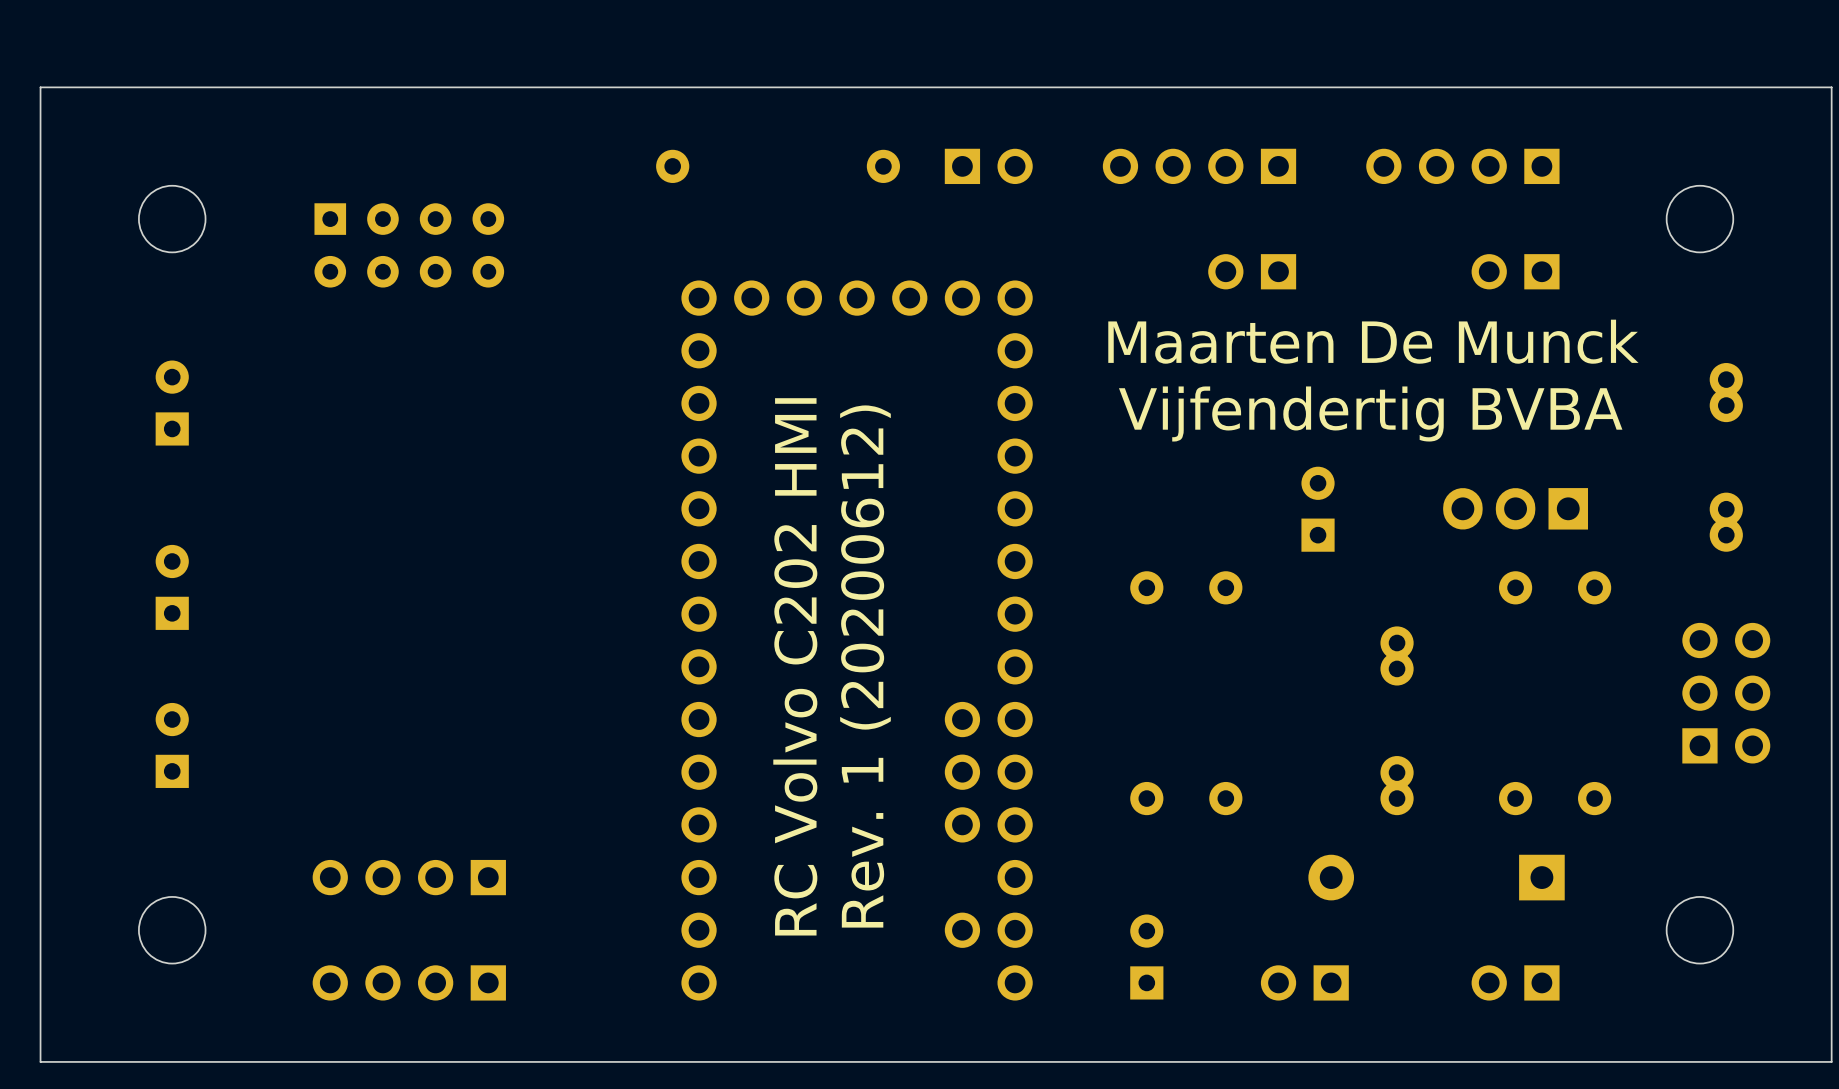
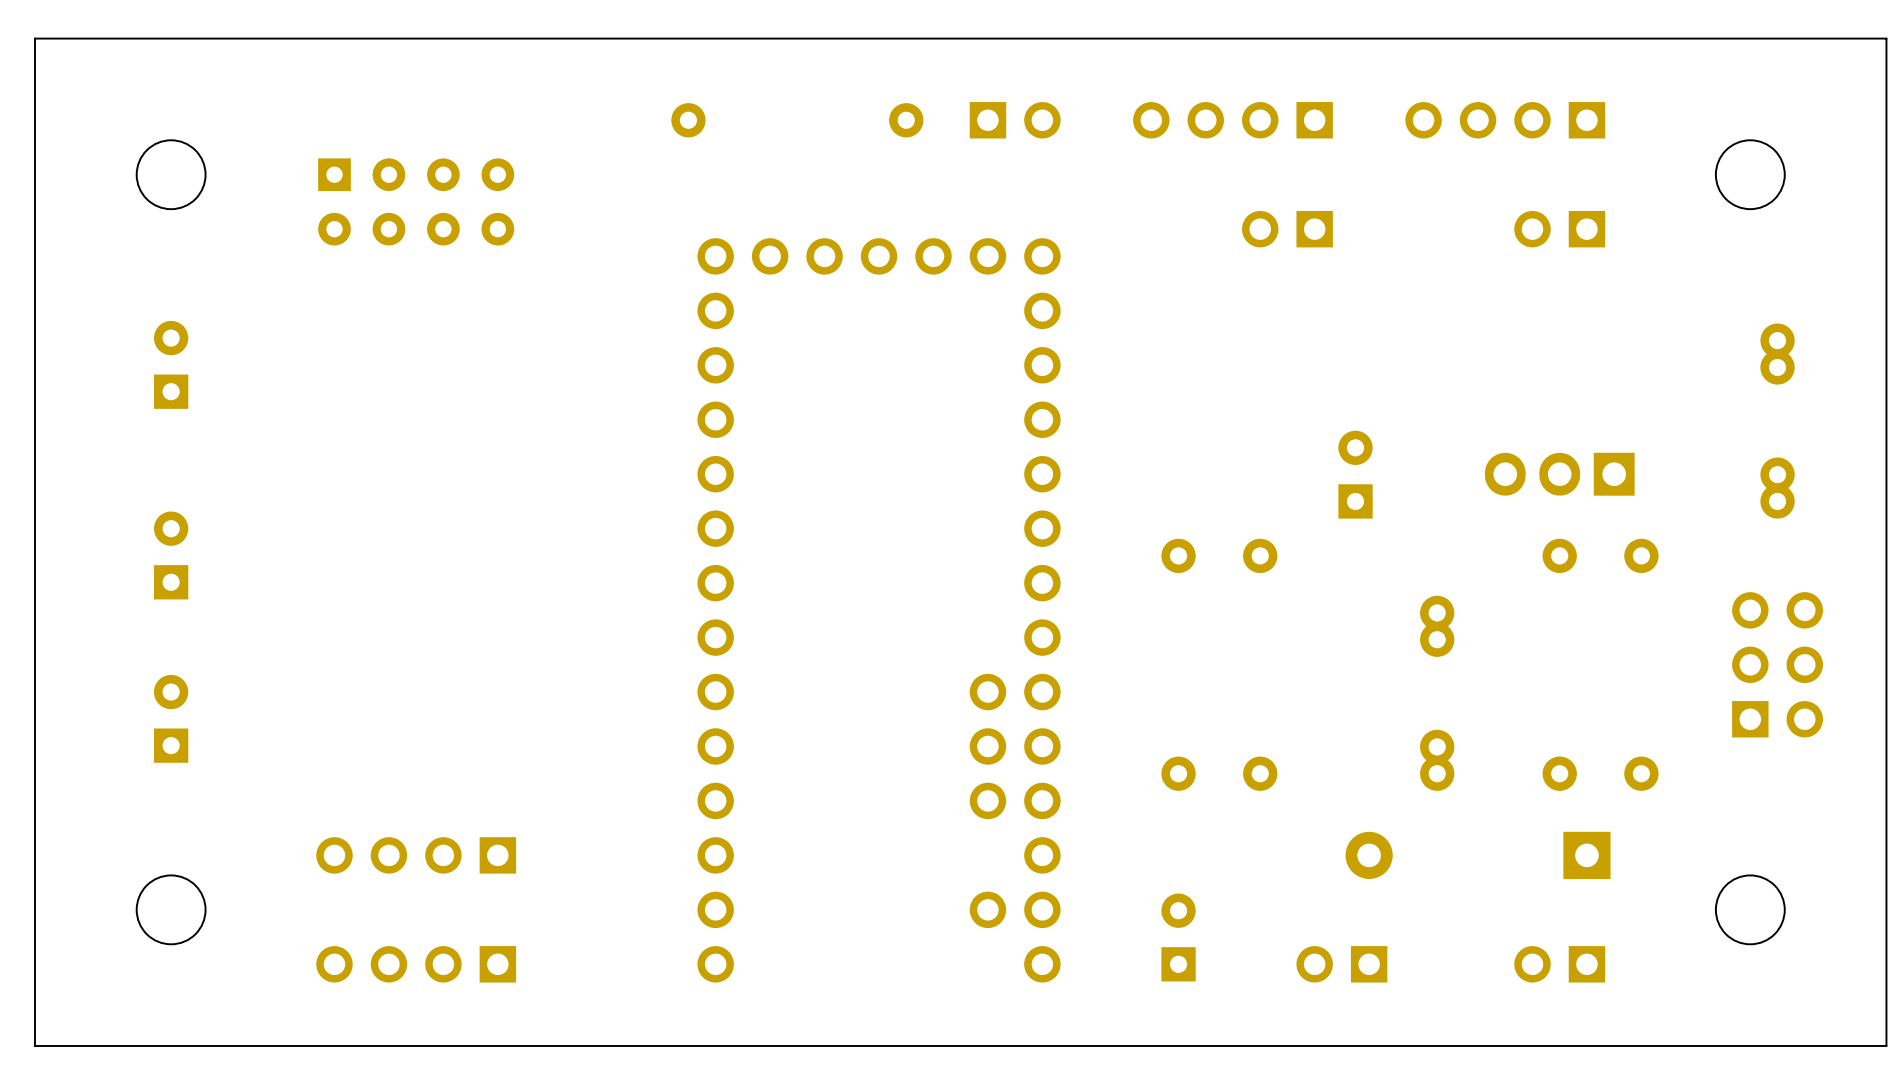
text: Maarten De Munck (1373, 341) -> none
text: Vijfendertig BVBA (1370, 413) -> none
text: RC Volvo C202 HMI (795, 666) -> none
text: Rev. 1 (20200612) (865, 666) -> none

